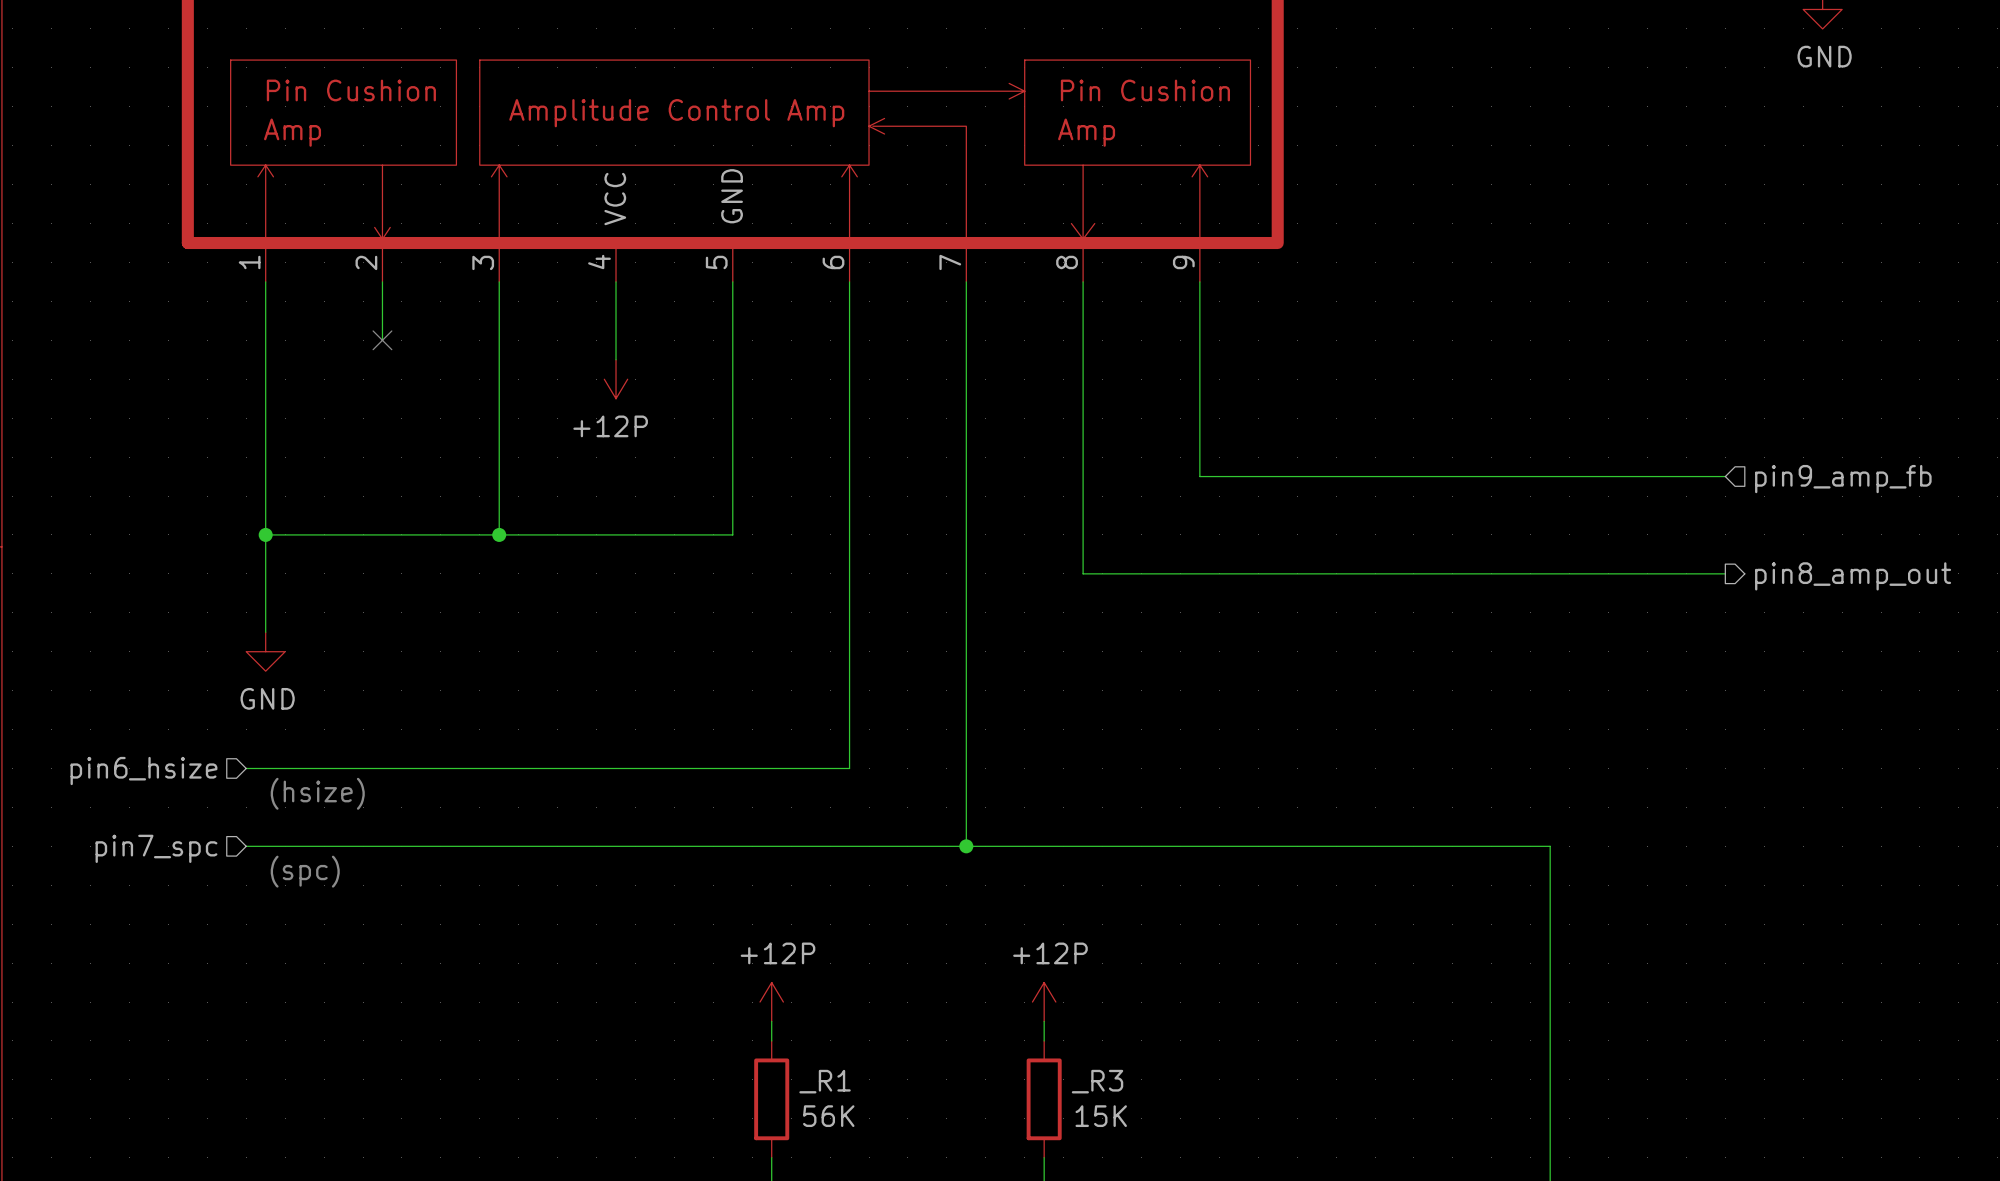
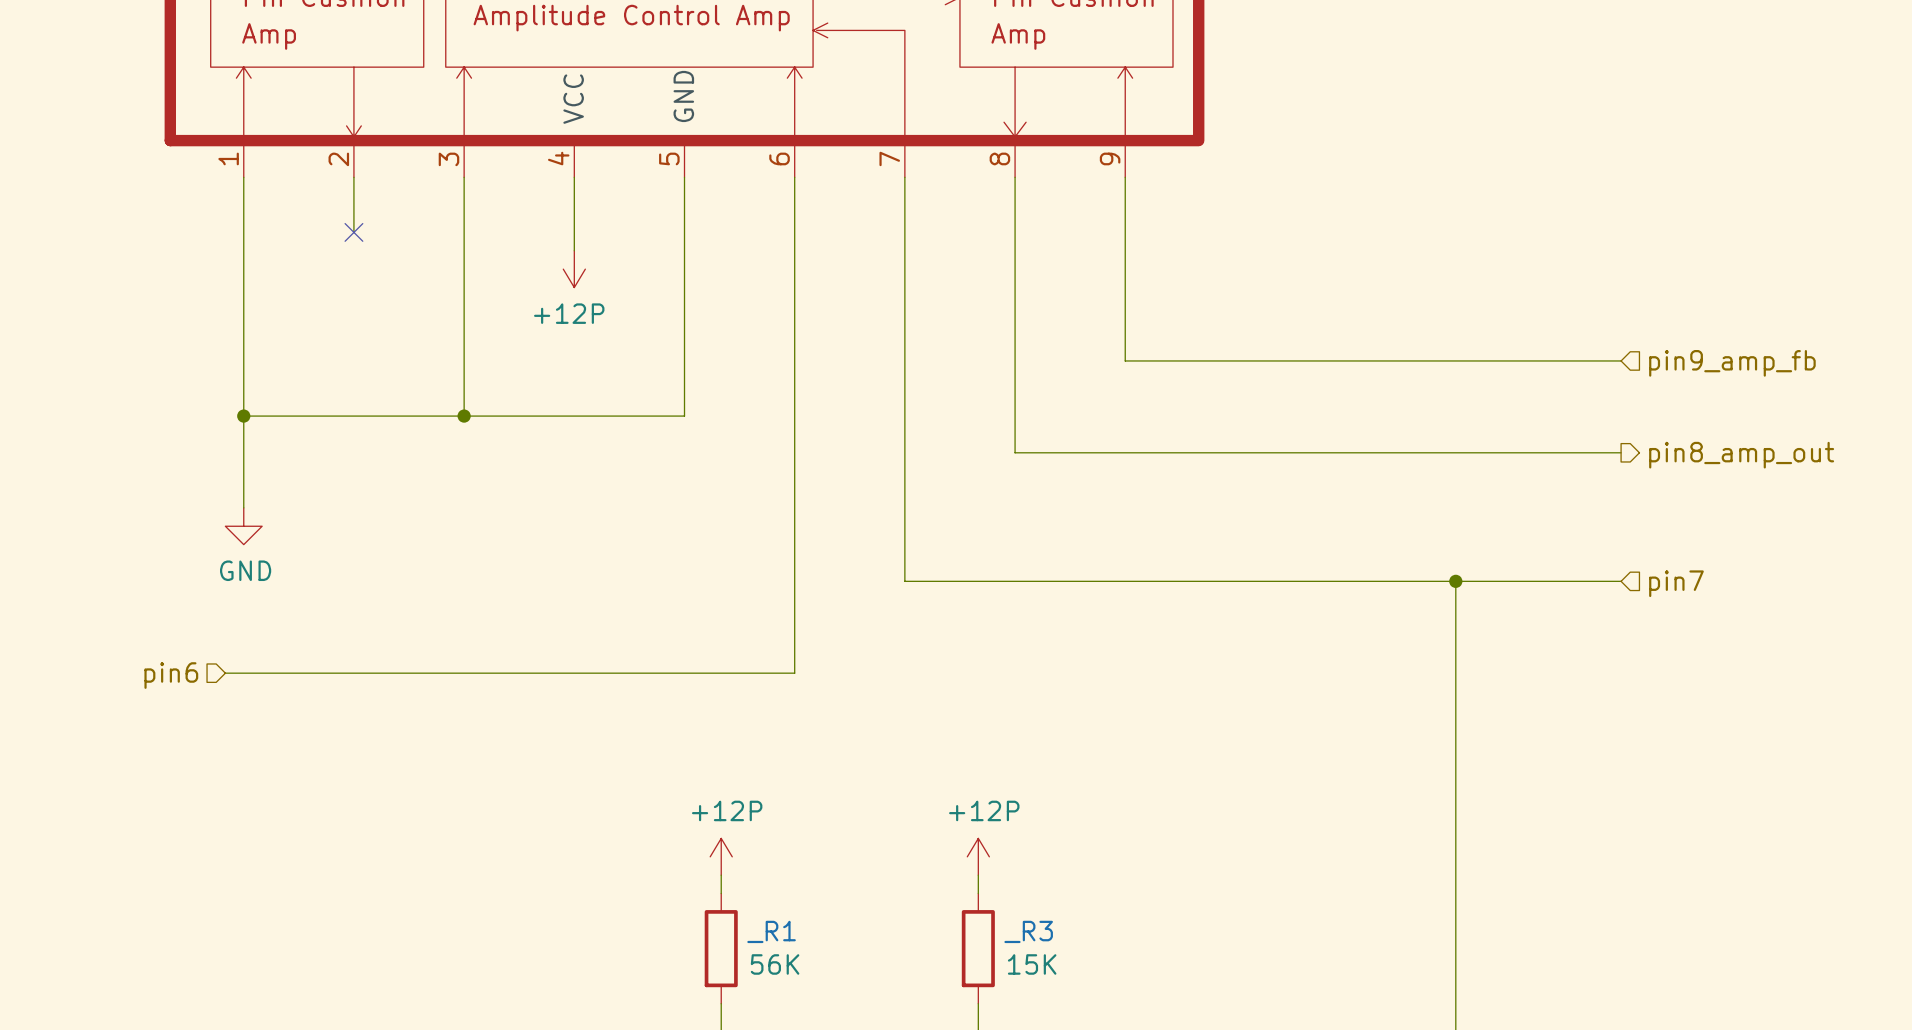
wire: (966, 710) (966, 846) -> (904, 581) (1621, 581)
junction: none -> (1455, 581)
hierarchical label: none -> pin7 (1676, 583)
wire: (246, 768) (849, 768) -> (225, 673) (794, 673) (794, 636)
hierarchical label: pin6_hsize (143, 771) -> none
text: (hsize) (317, 793) -> none
hierarchical label: none -> pin6 (171, 675)
wire: (246, 846) (1550, 846) -> (1455, 581) (1455, 709)
junction: (966, 846) -> none
hierarchical label: pin7_spc (156, 848) -> none
text: (spc) (305, 871) -> none

